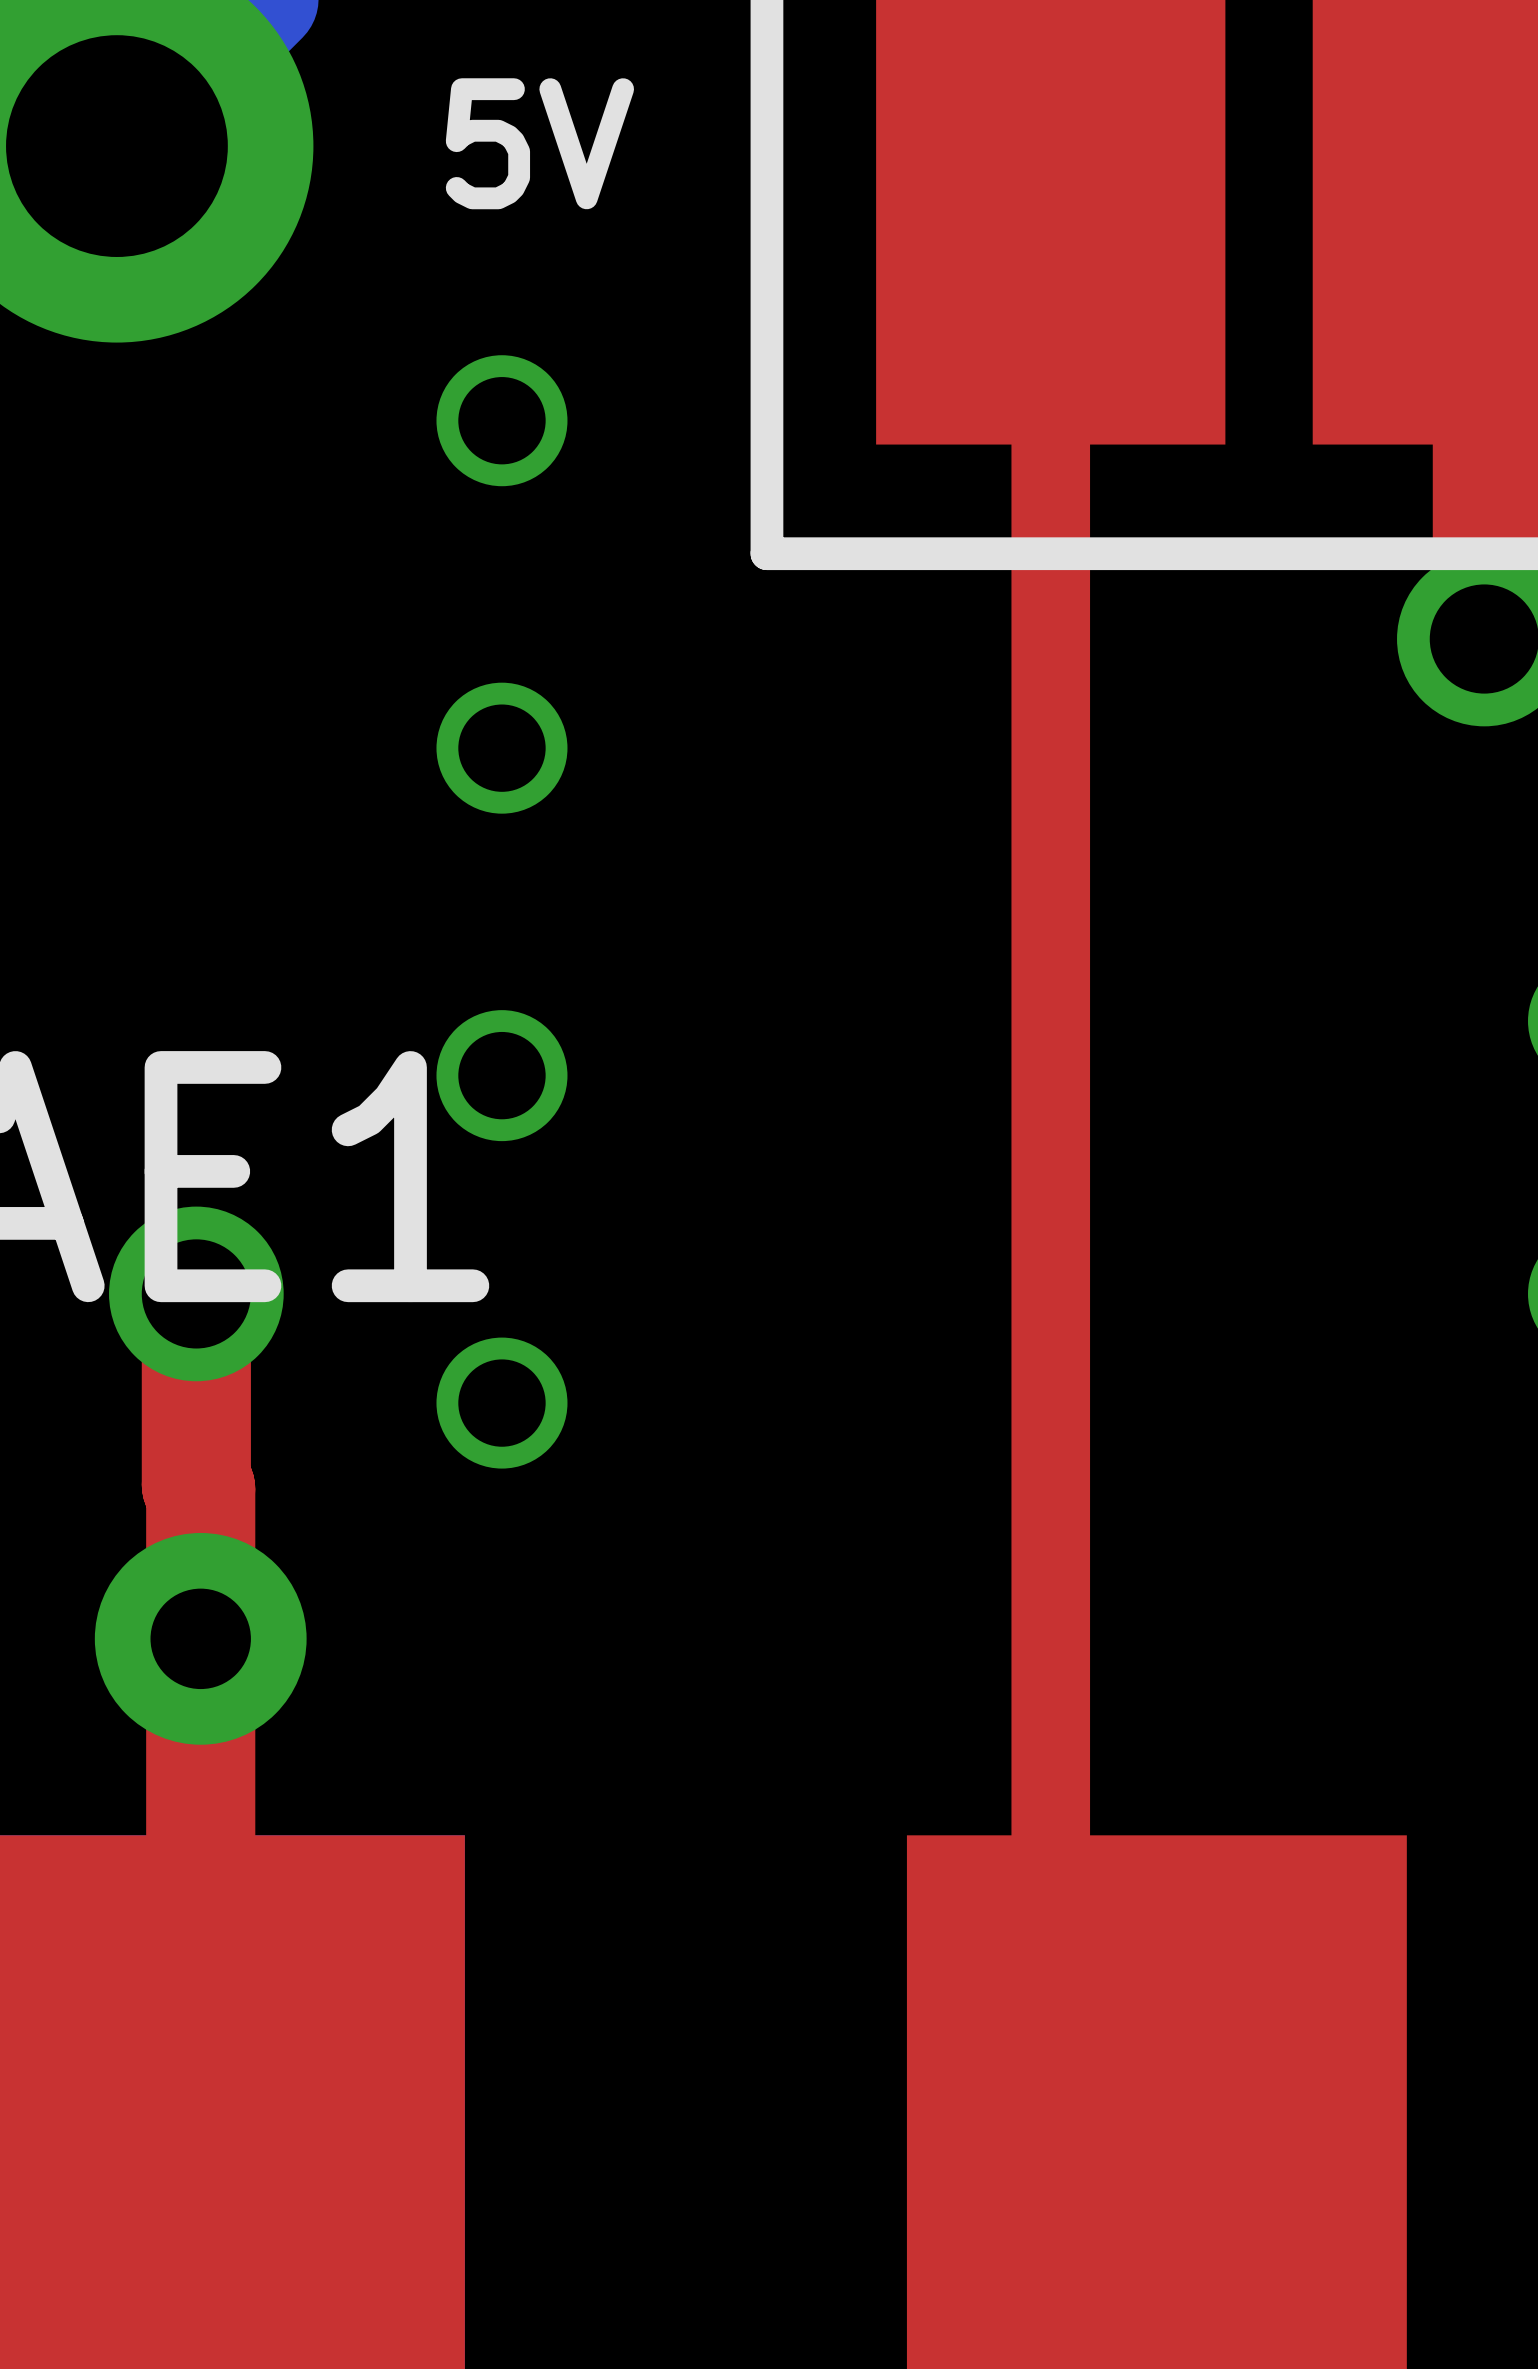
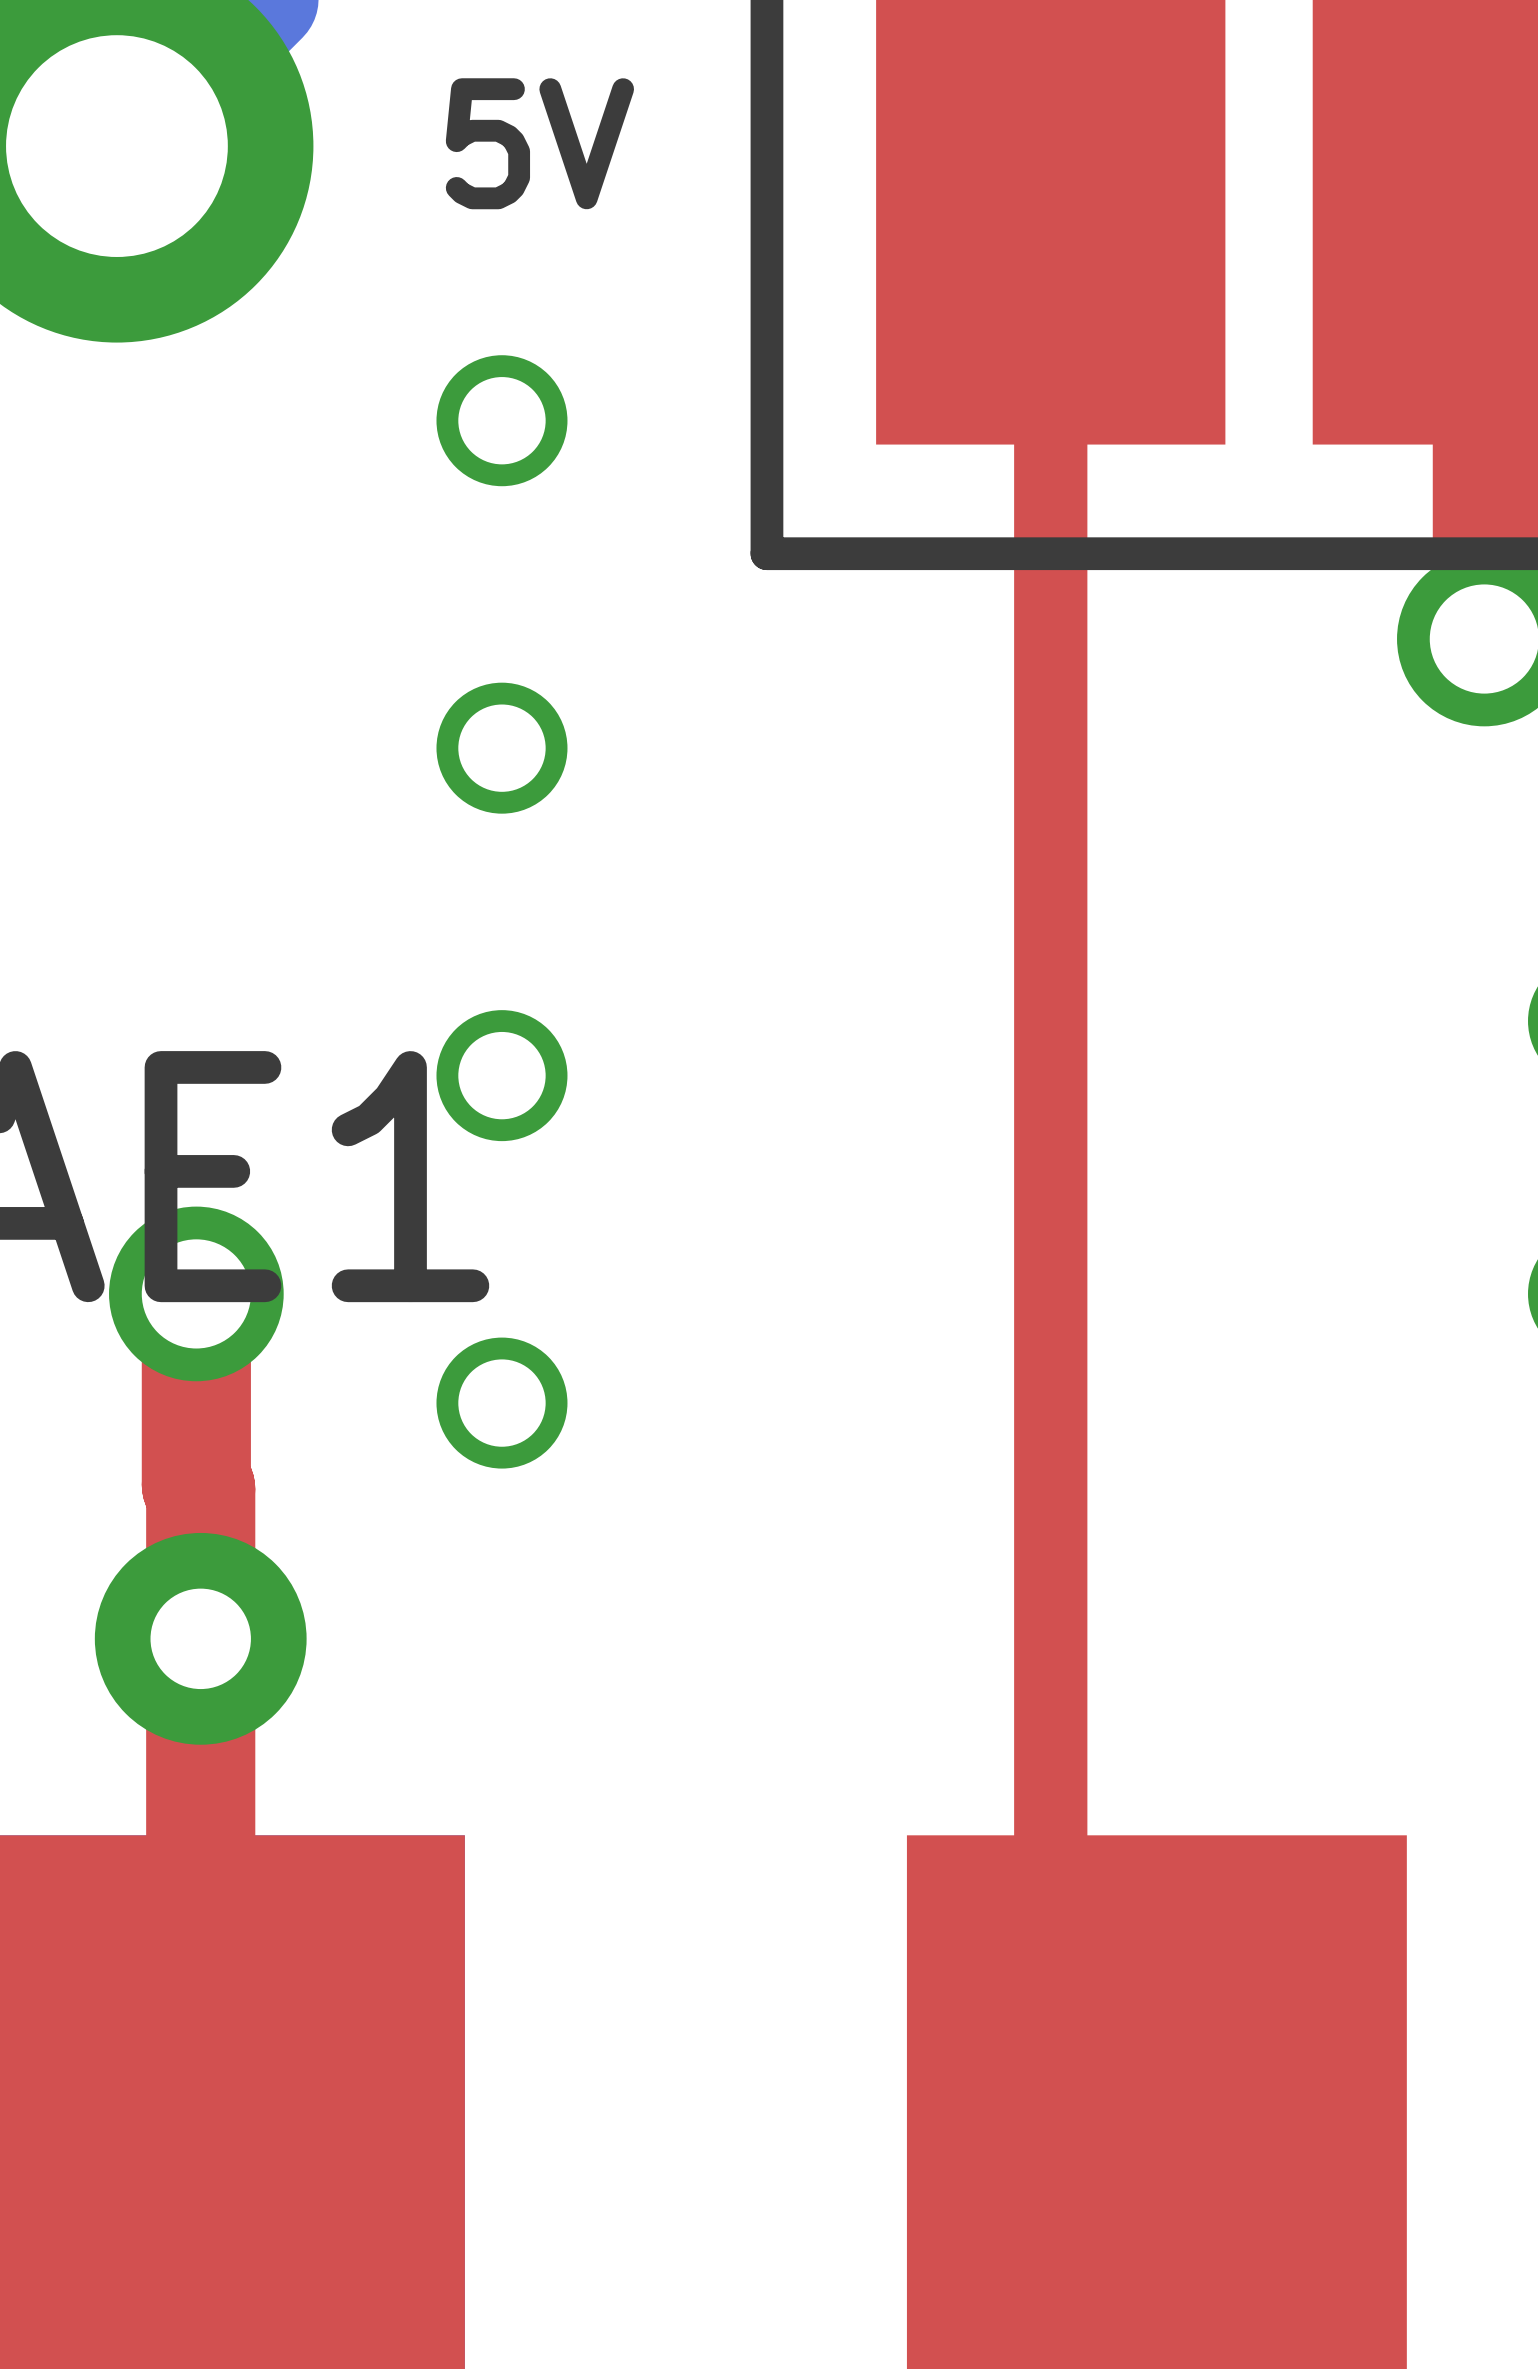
top track width: thick (1050, 117) (1050, 2283) -> thin (1050, 117) (1050, 2283)

